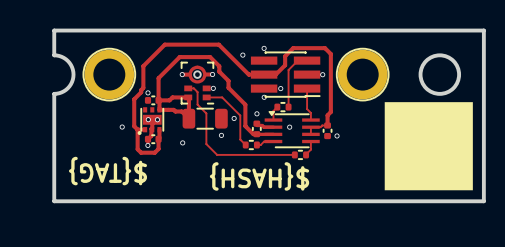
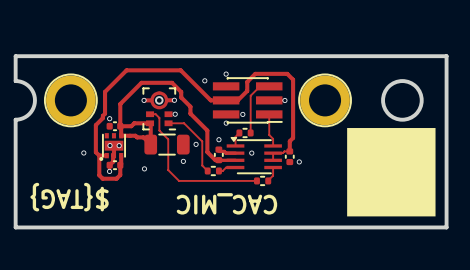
text: ${HASH} (259, 176) -> CAC_MIC (226, 203)

